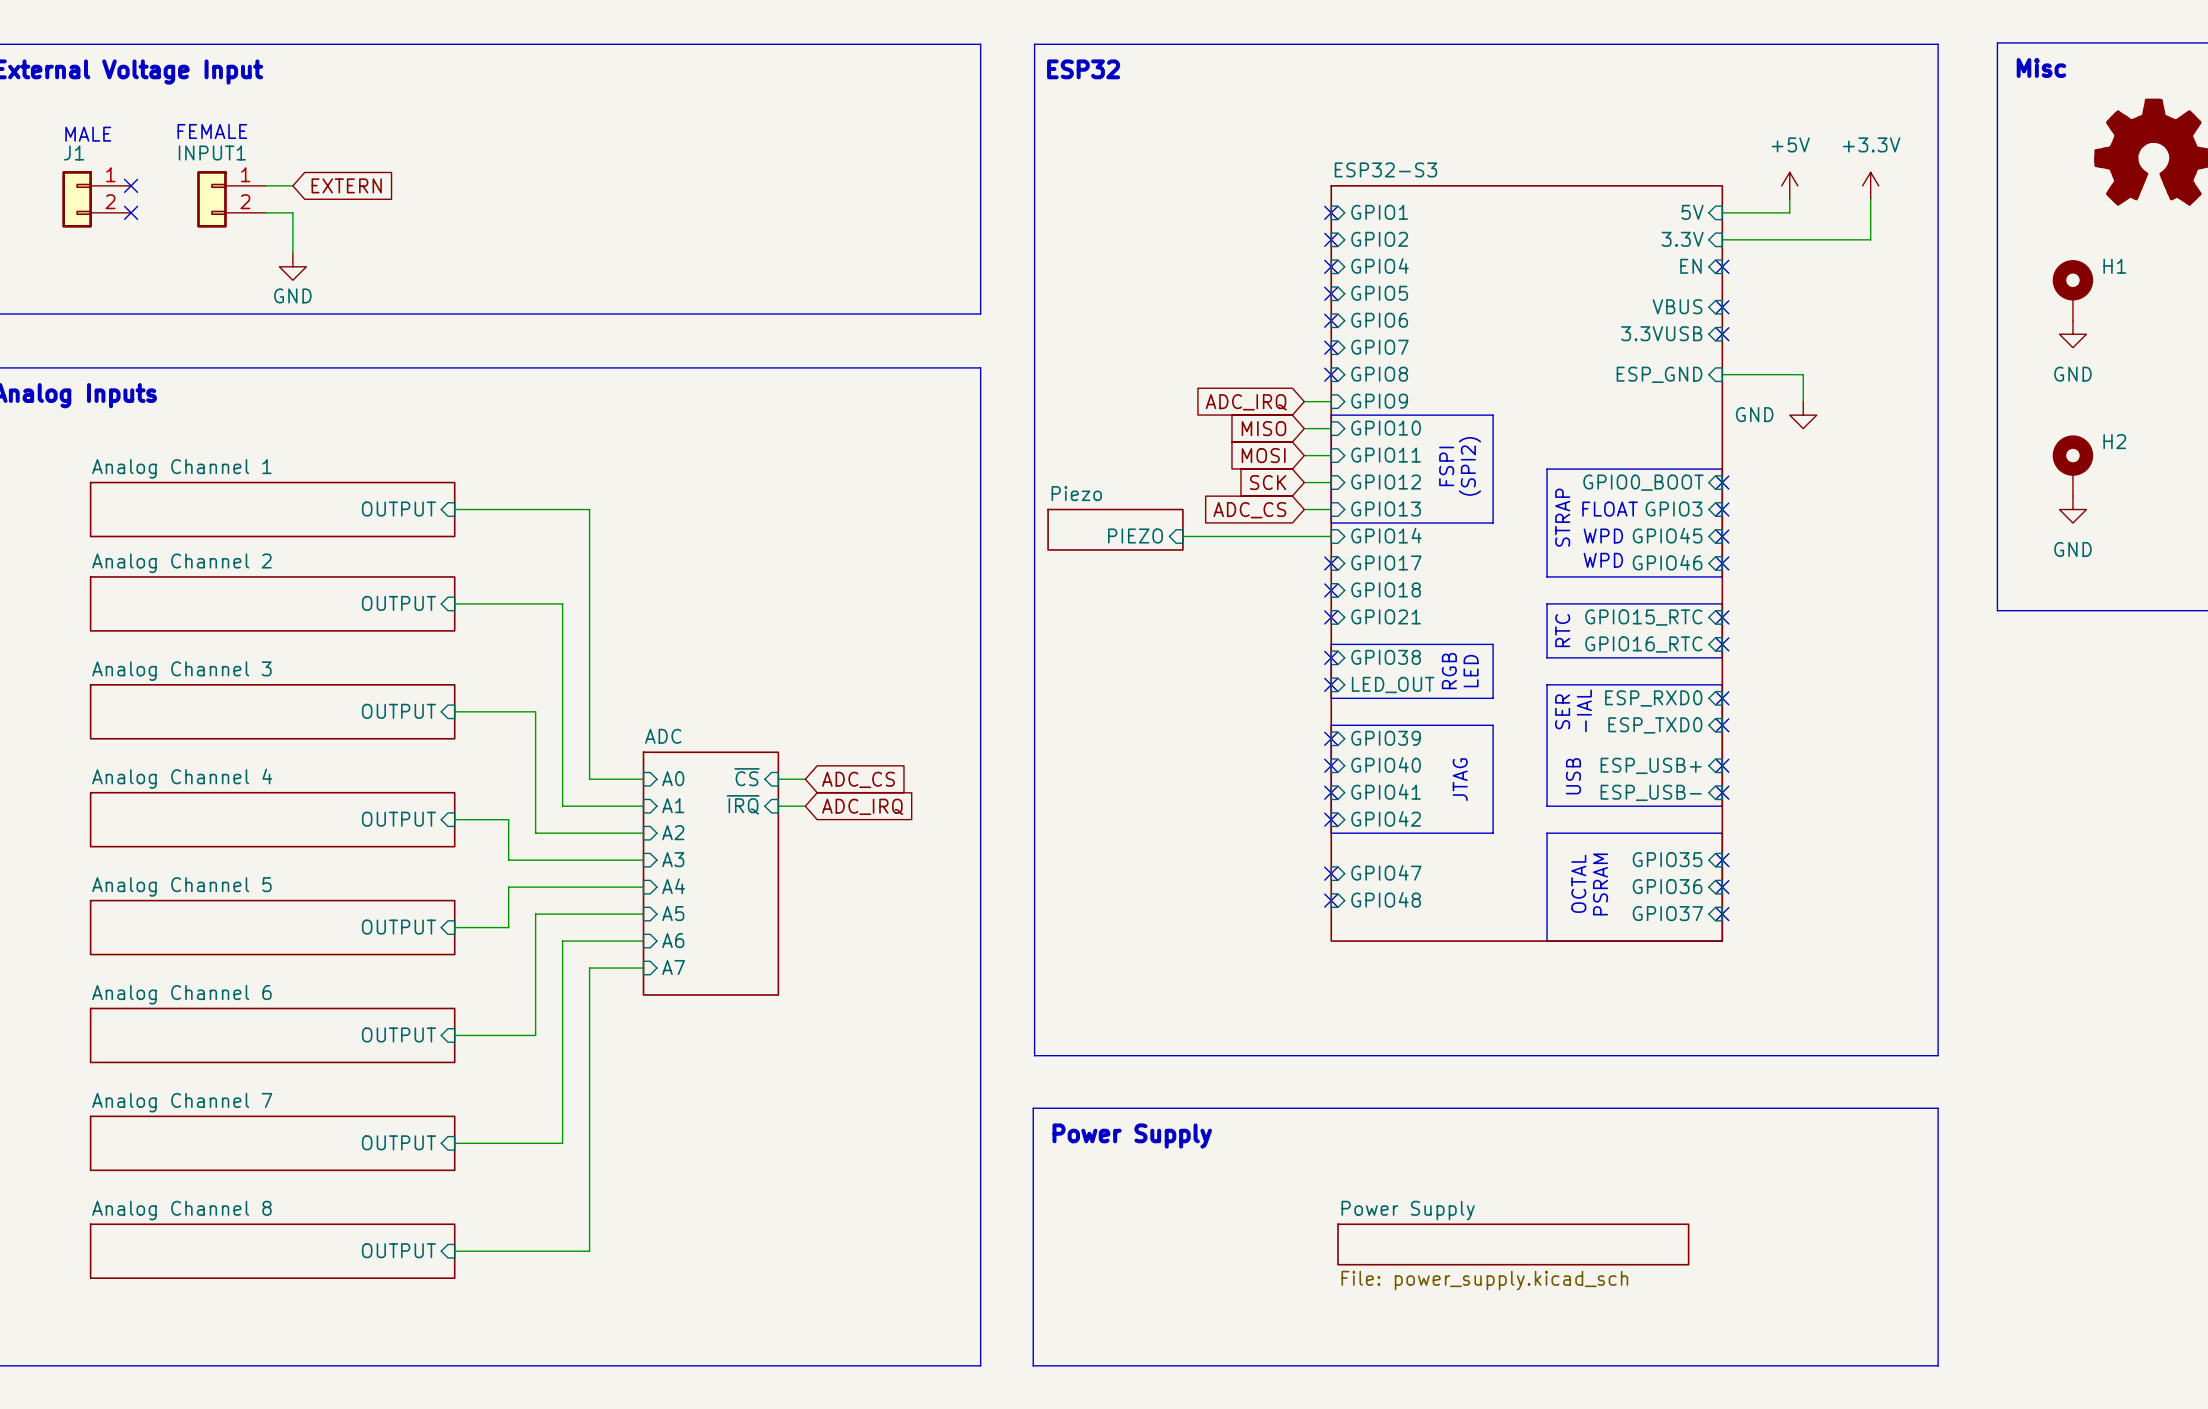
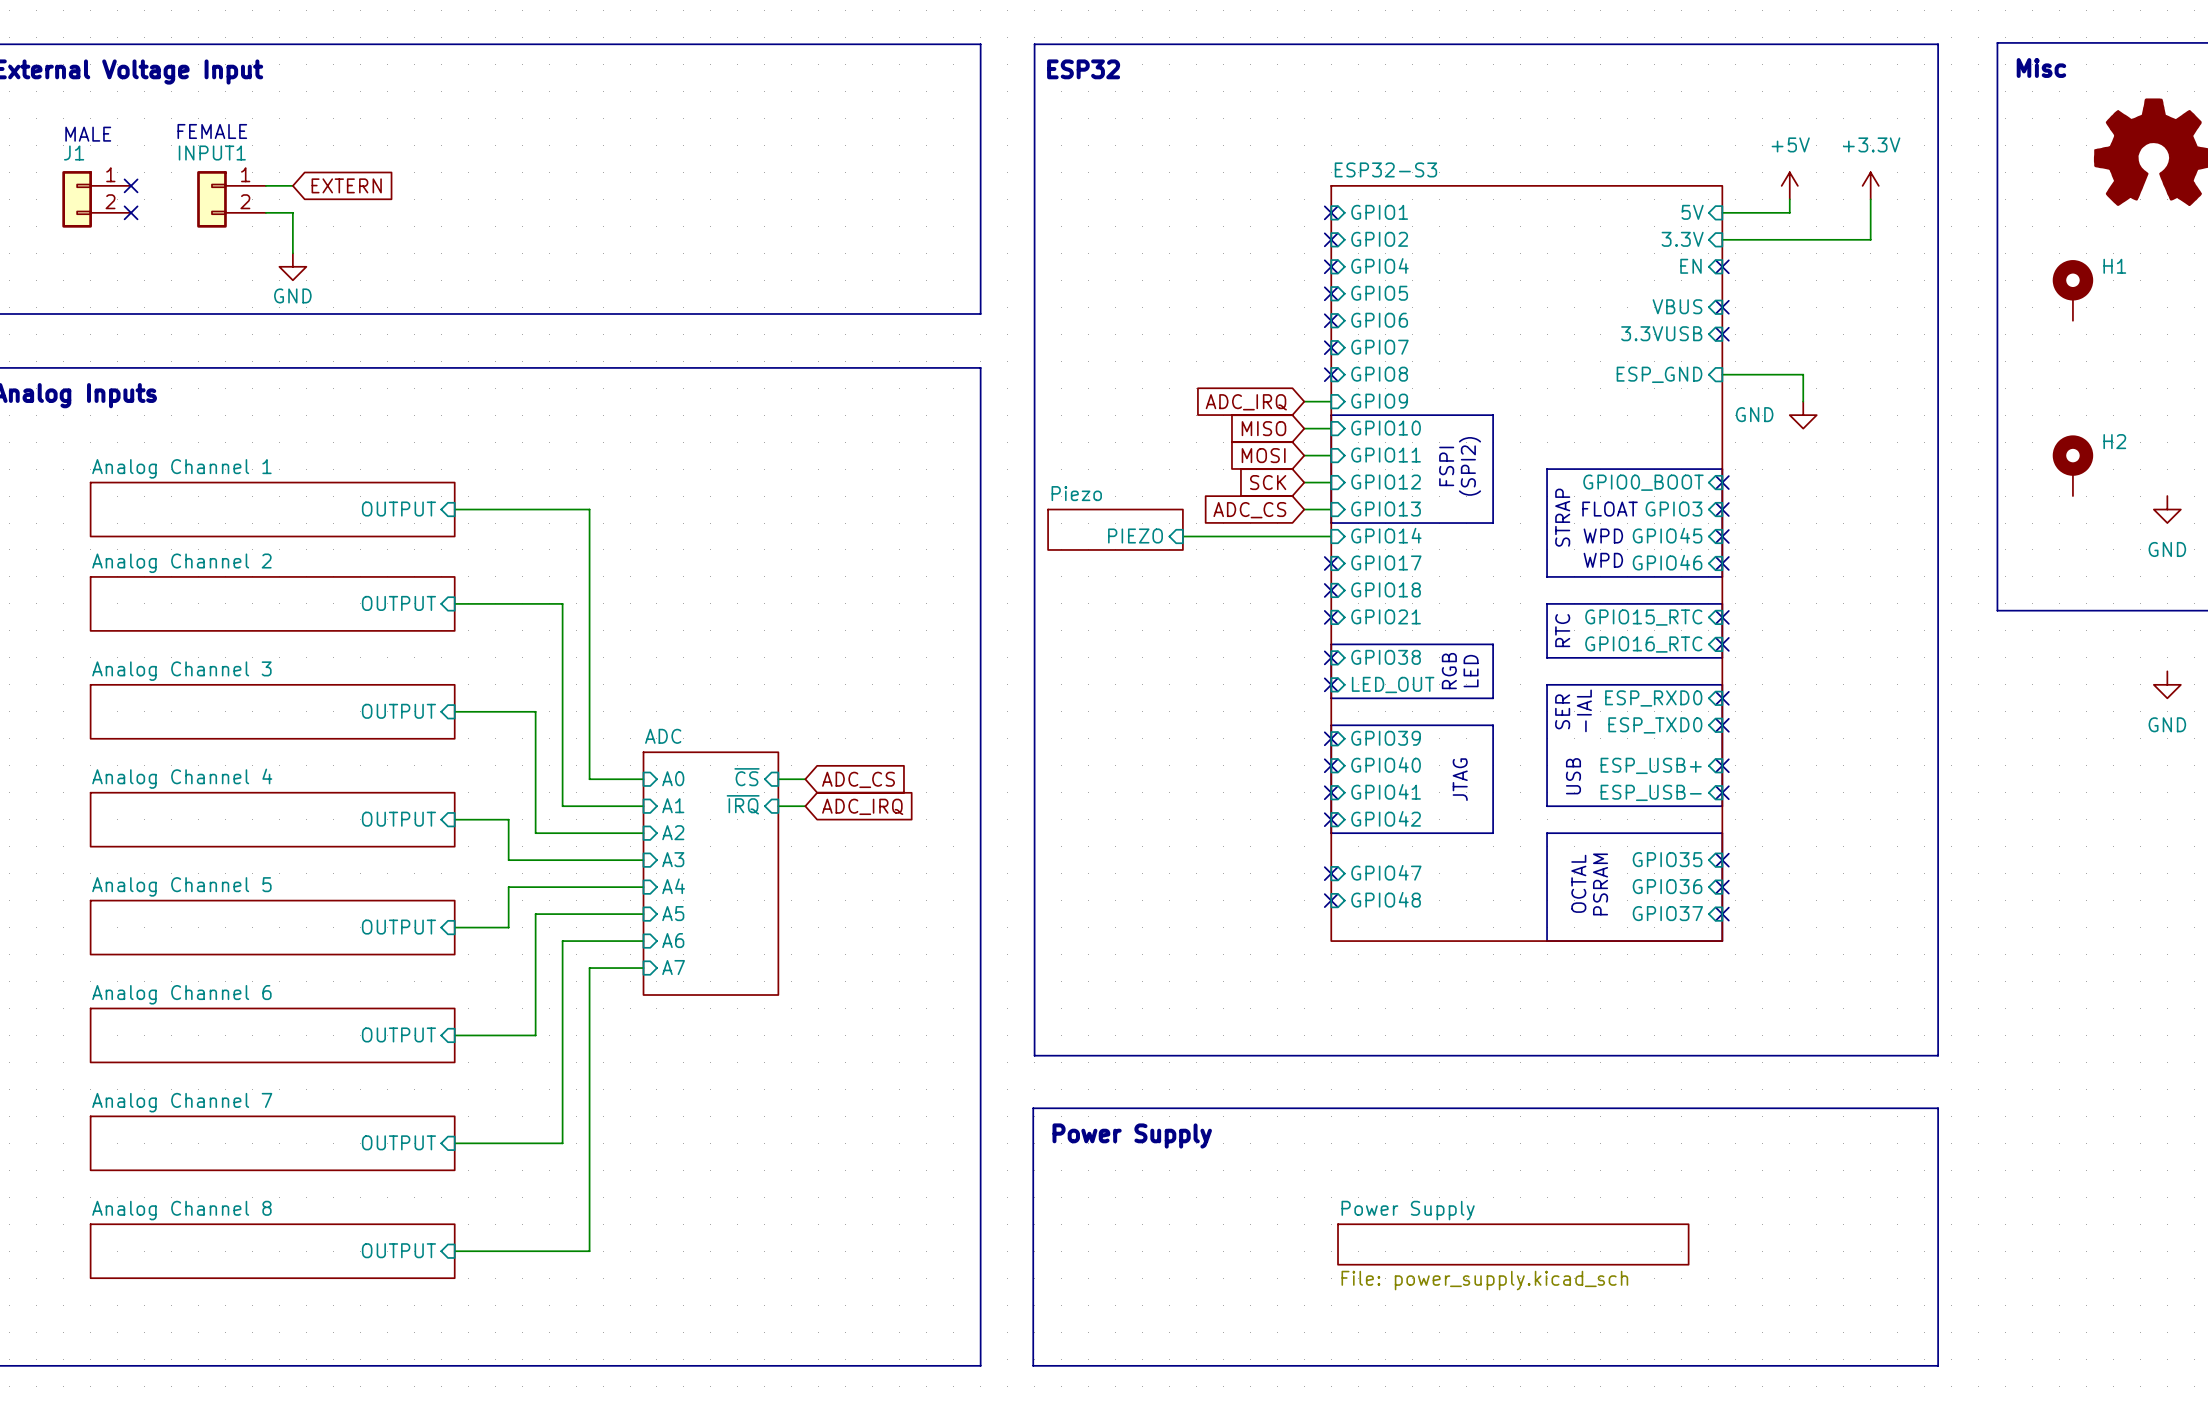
power symbol: GND (2072, 334) -> none
power symbol: GND (2072, 509) -> none
power symbol: none -> GND (2167, 509)
power symbol: none -> GND (2167, 684)

